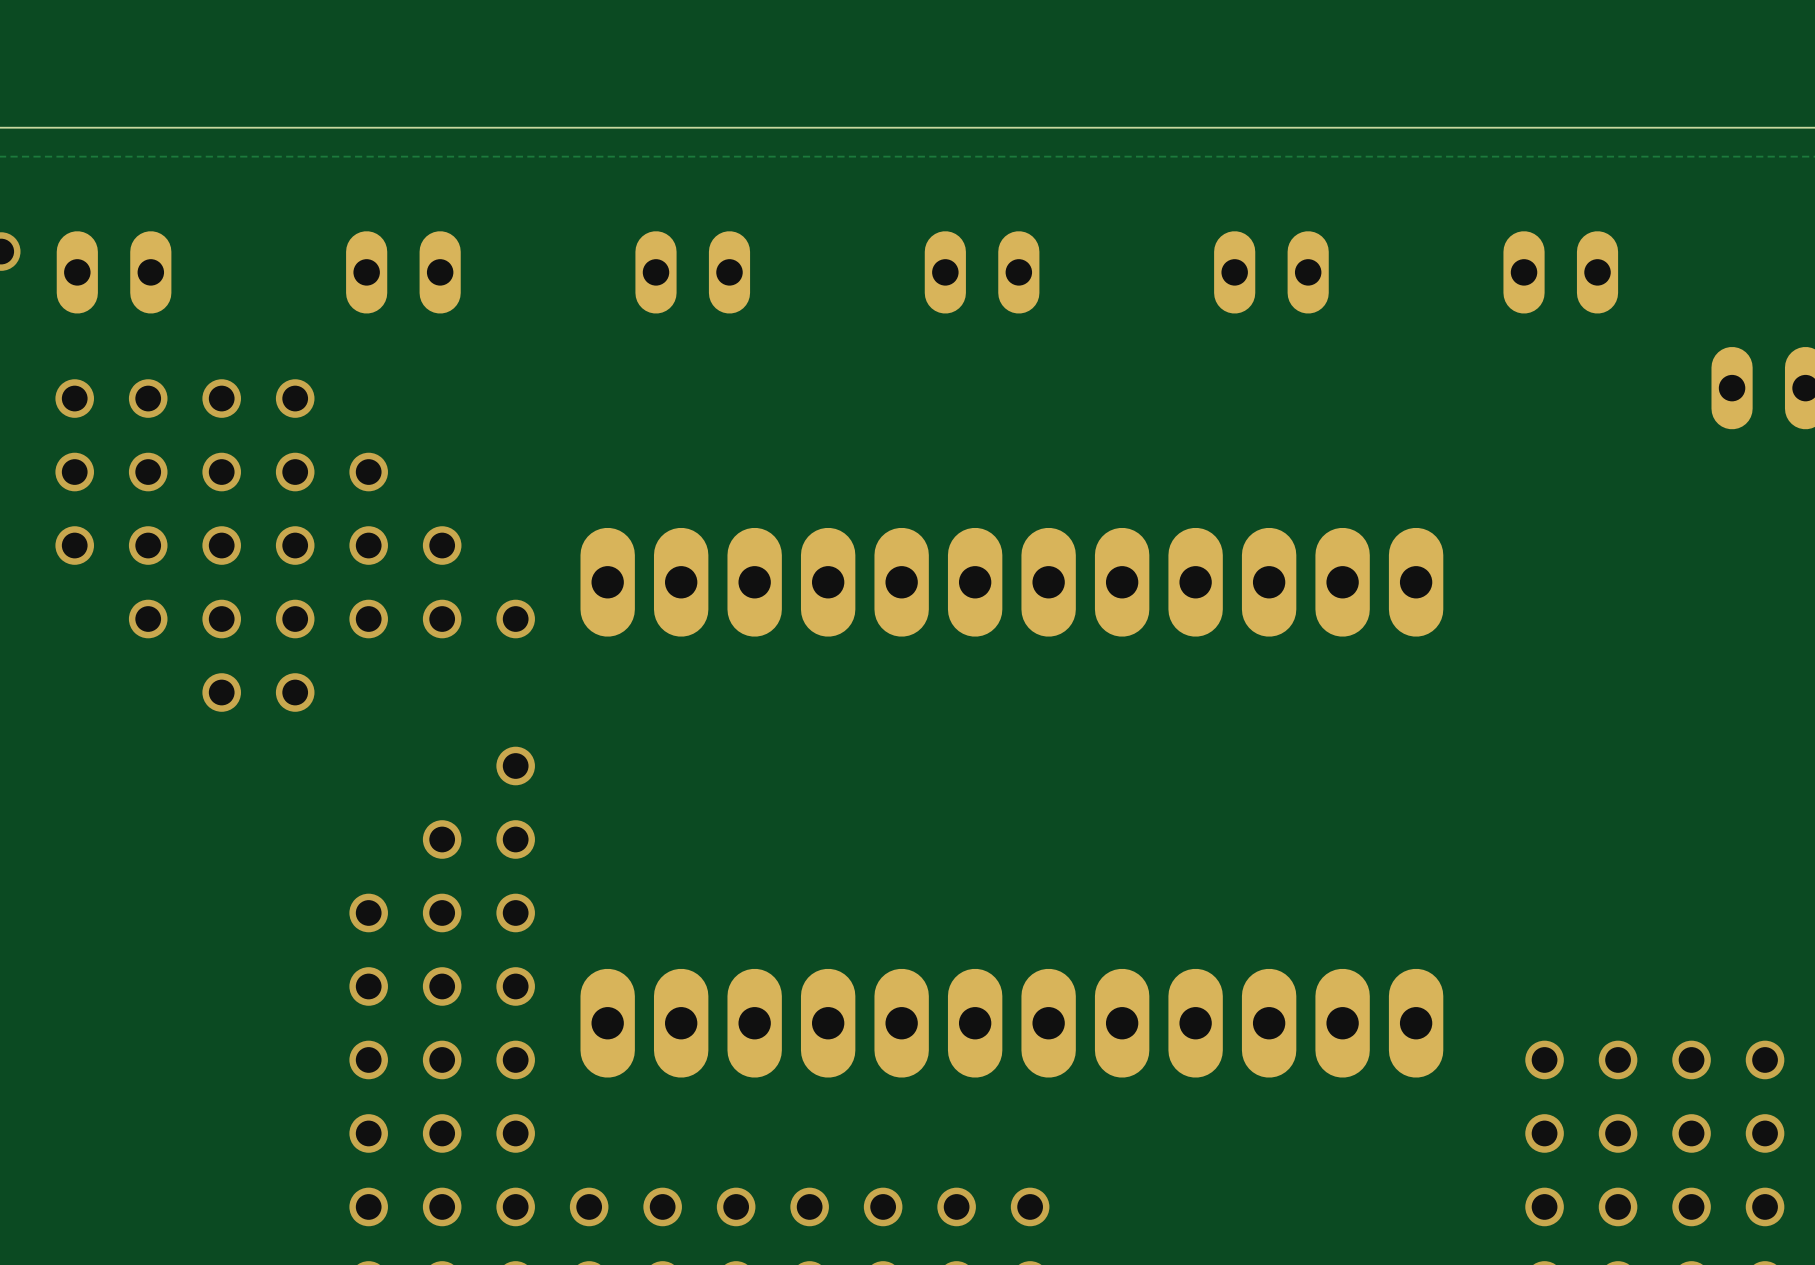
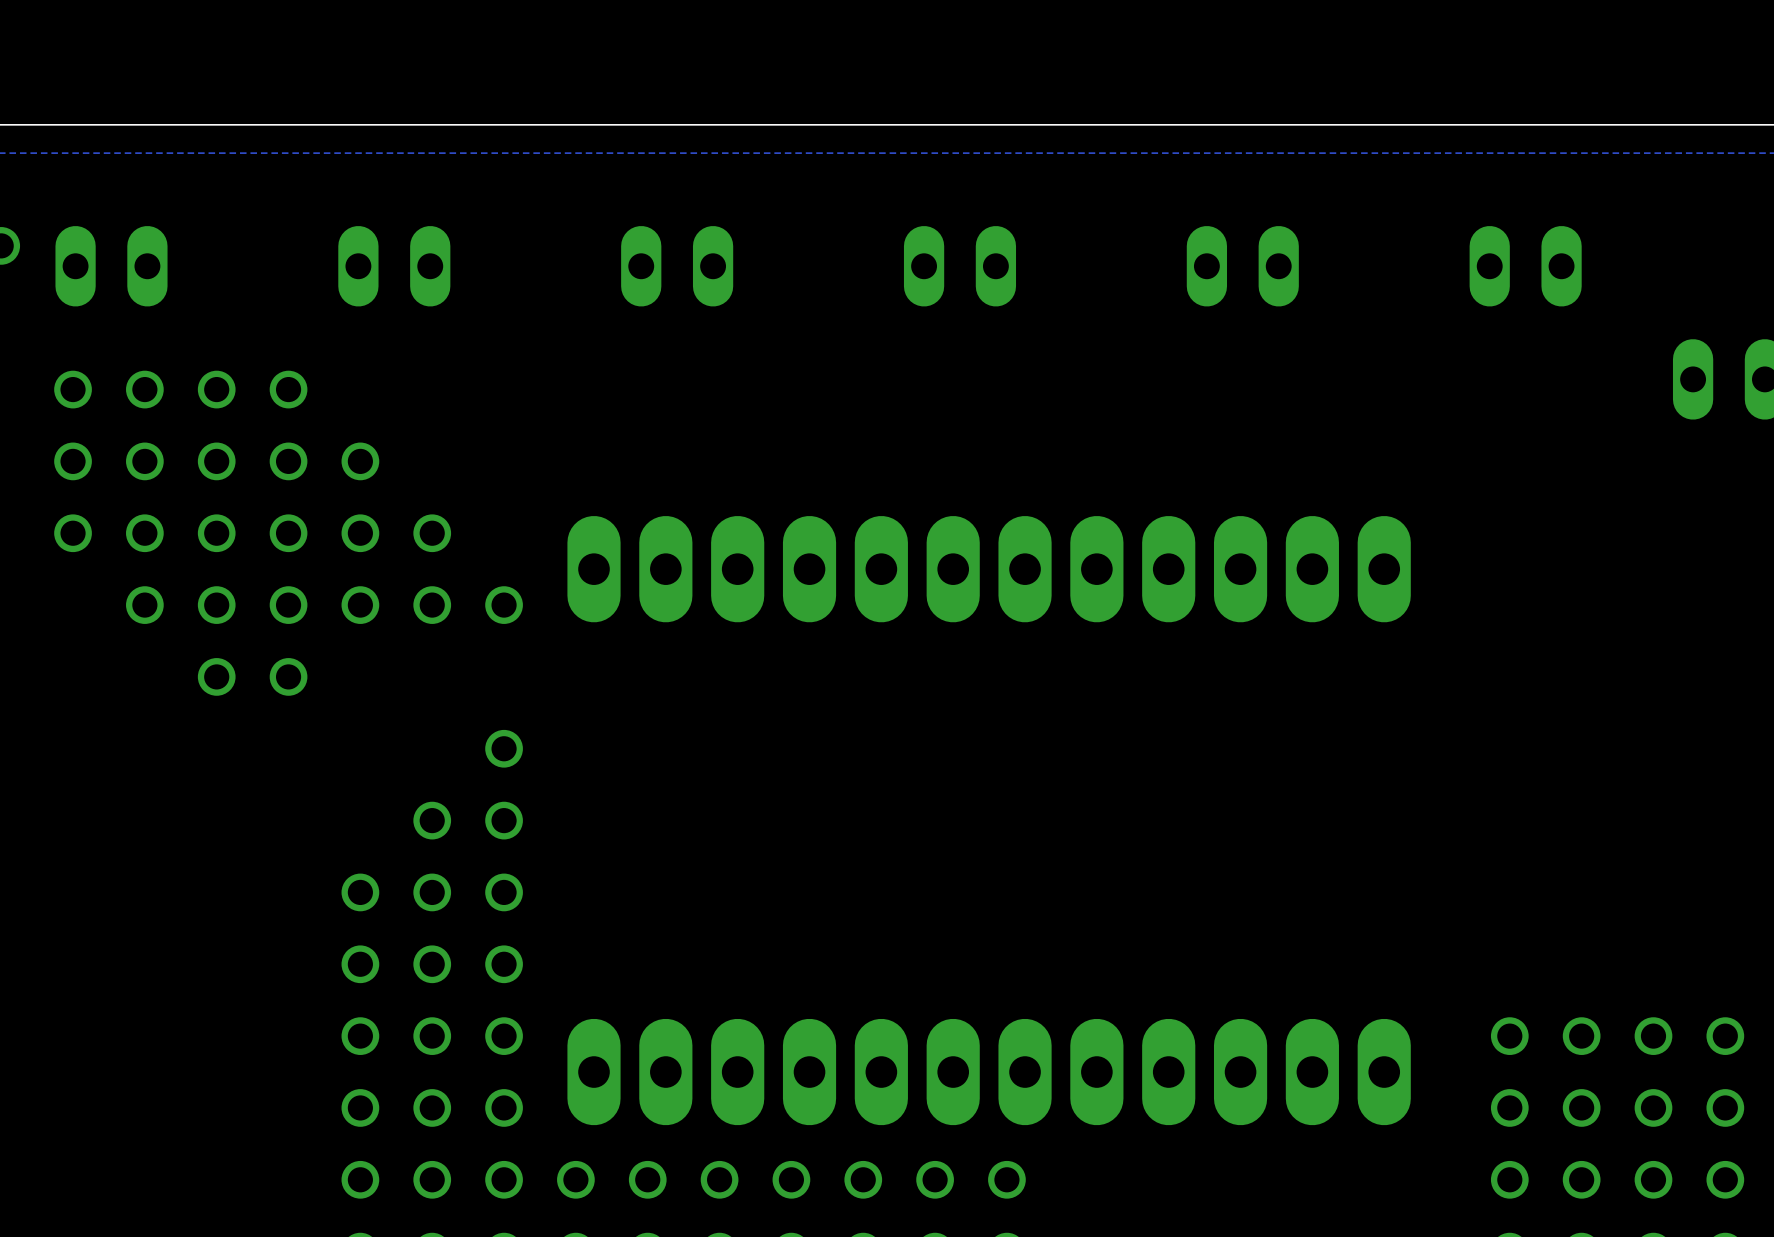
part position: (1011, 1023) -> (989, 1072)

